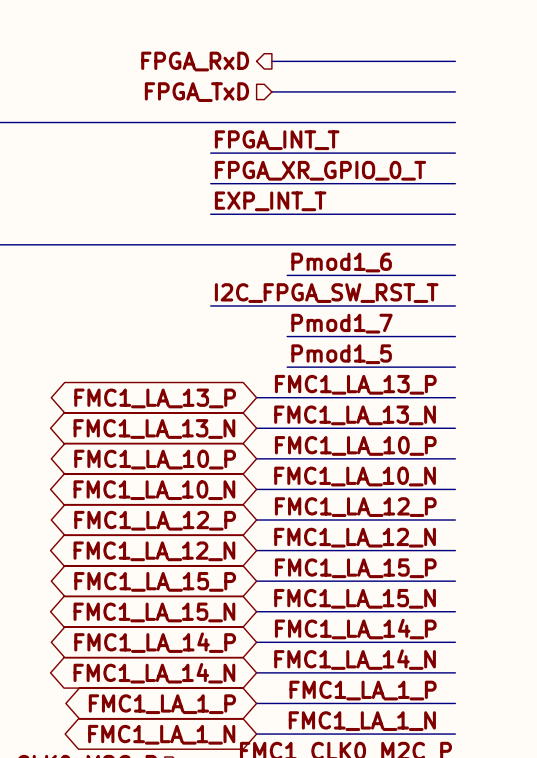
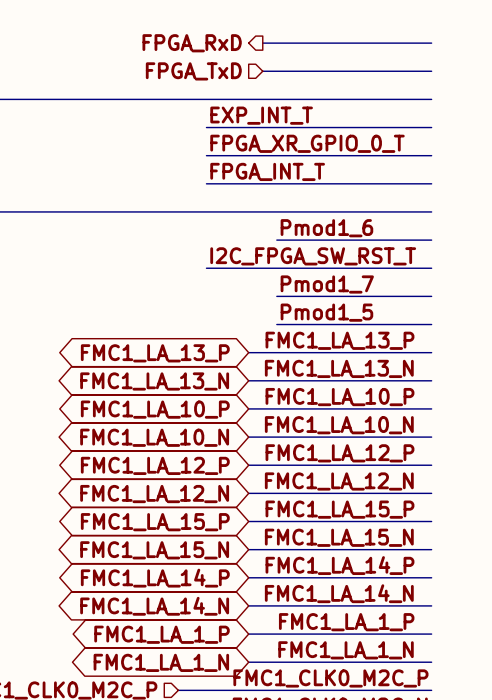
label: FPGA_INT_T (277, 140) -> EXP_INT_T (261, 115)
label: EXP_INT_T (270, 201) -> FPGA_INT_T (267, 171)

